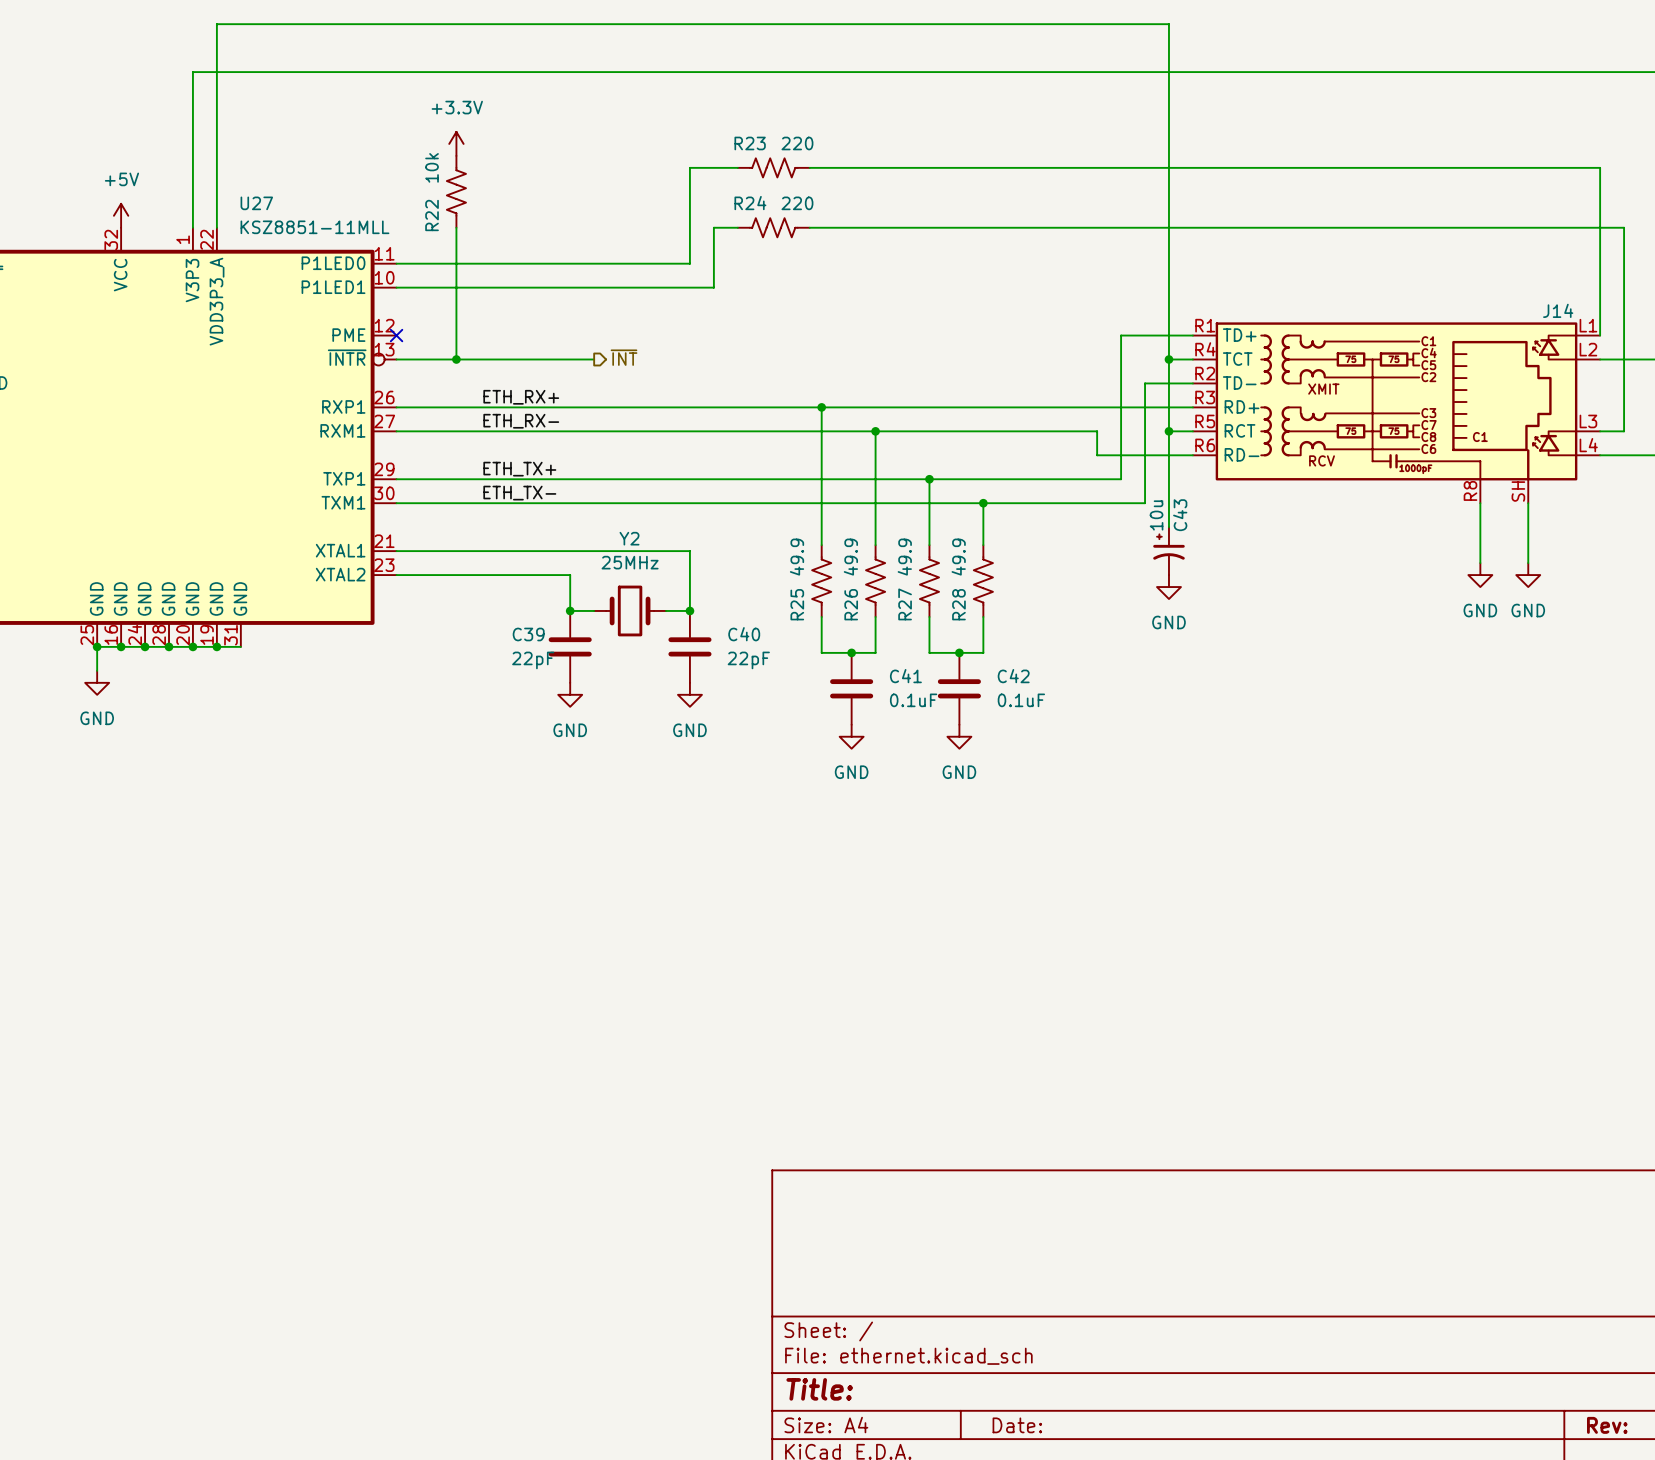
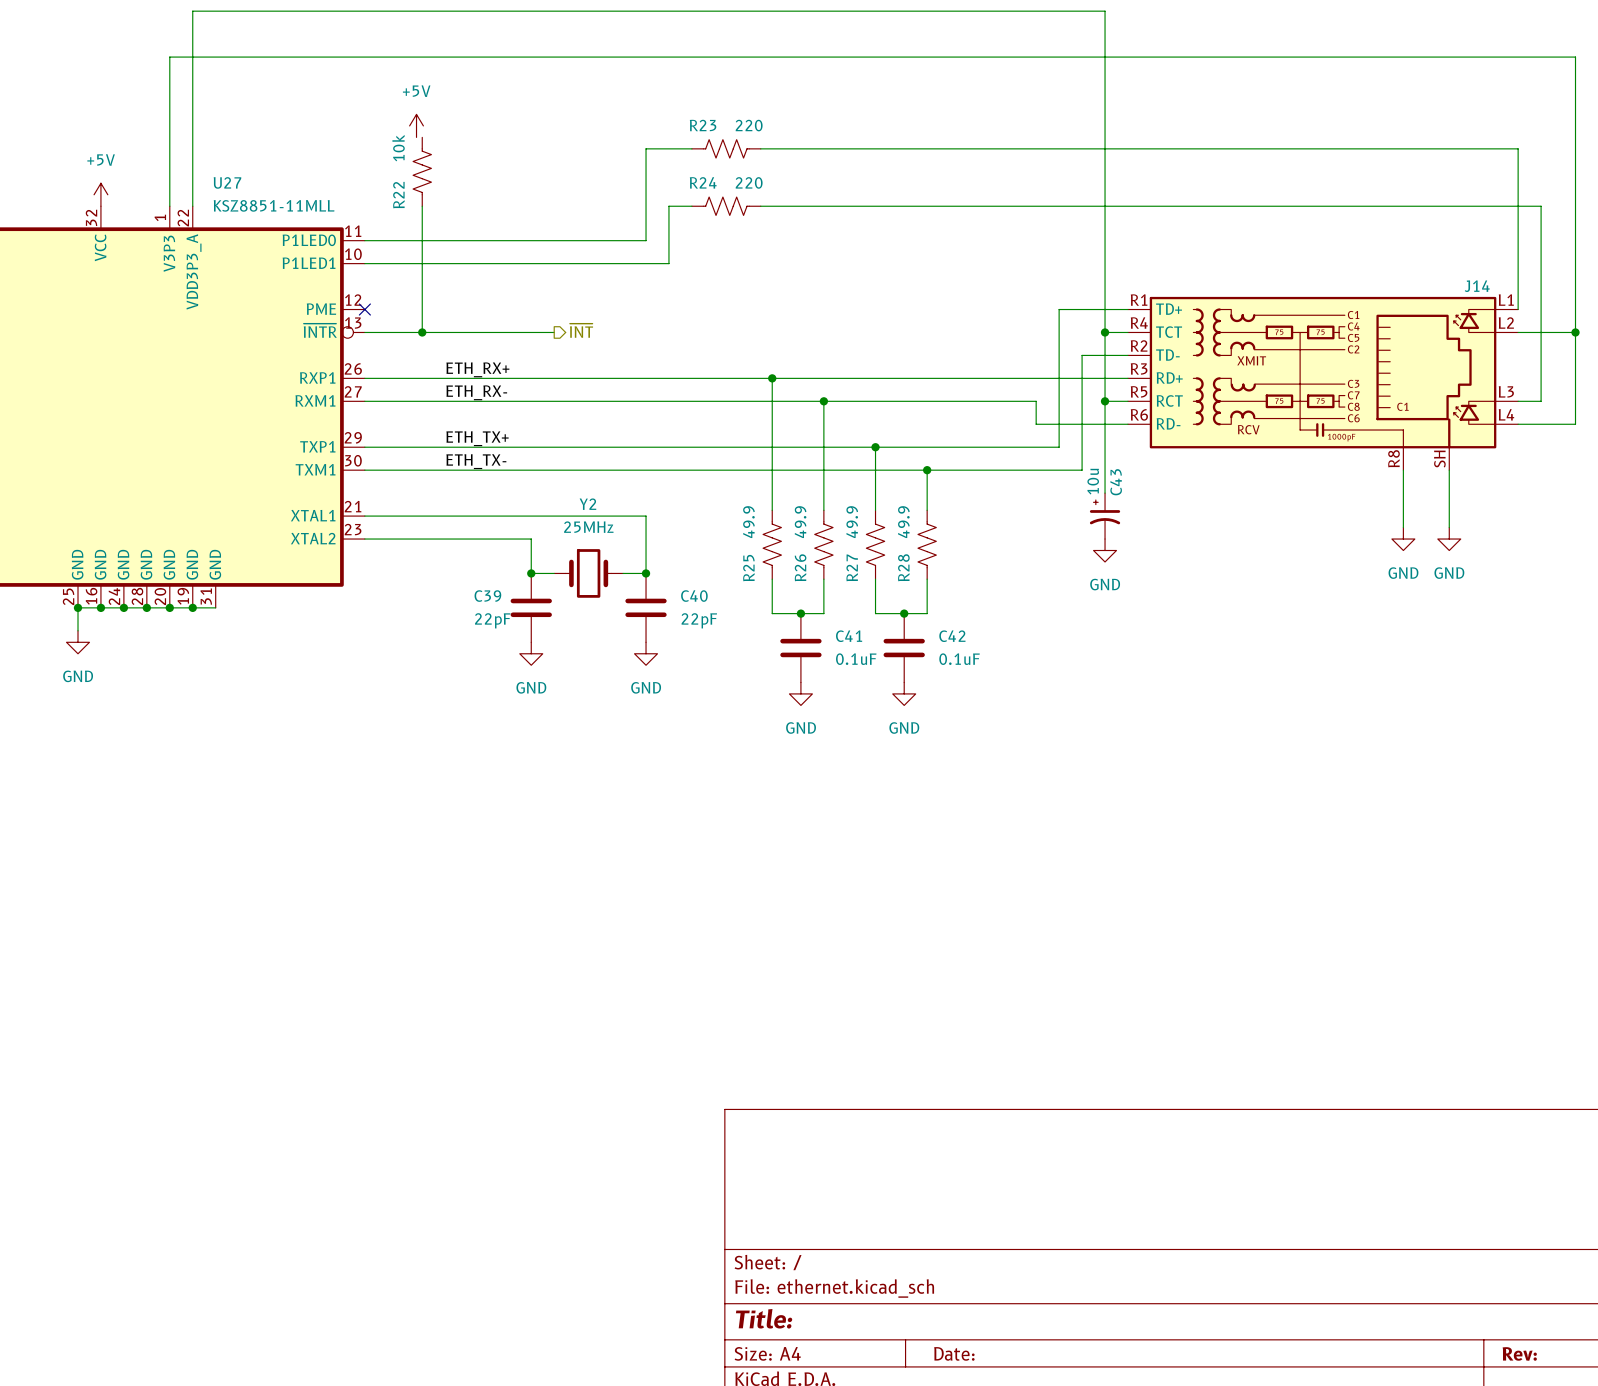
power symbol: +3.3V (456, 143) -> +5V (416, 125)

